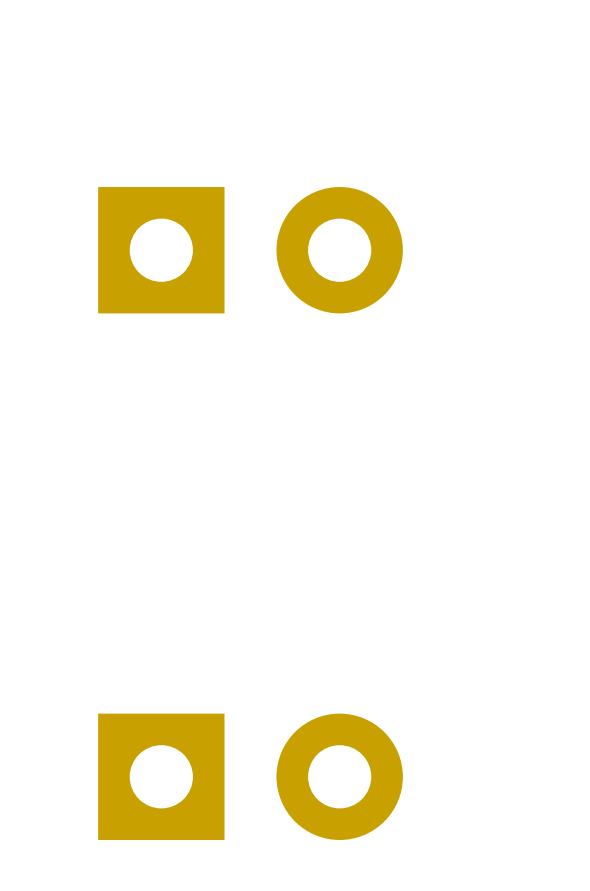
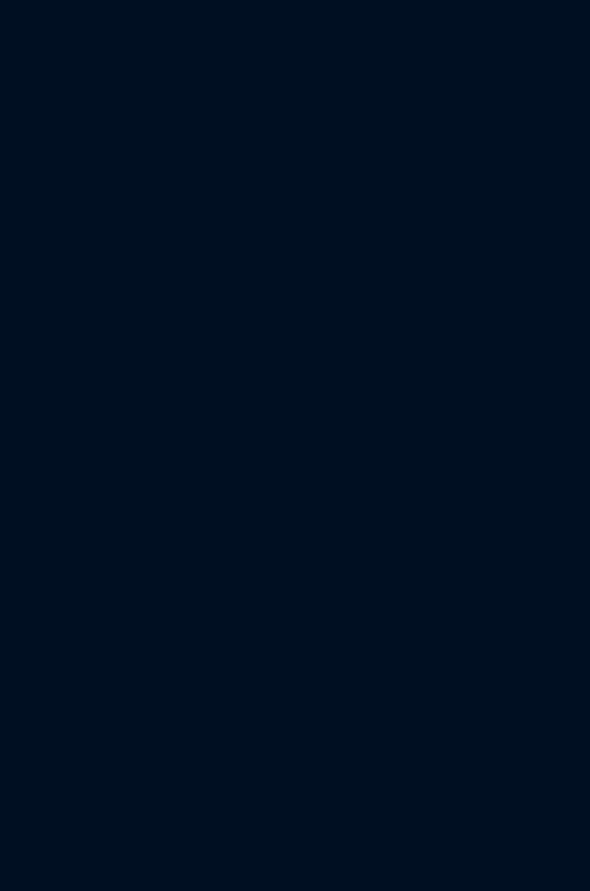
part: (250, 250) -> none
part: (250, 776) -> none

